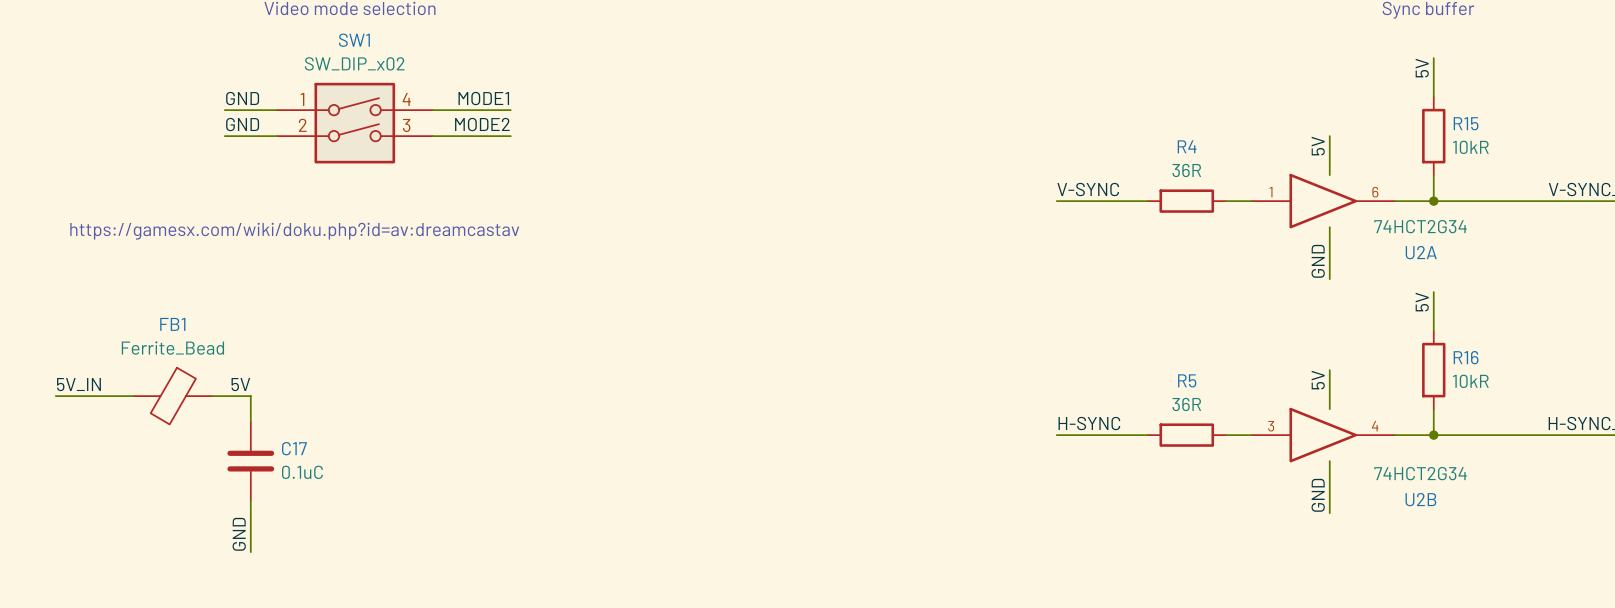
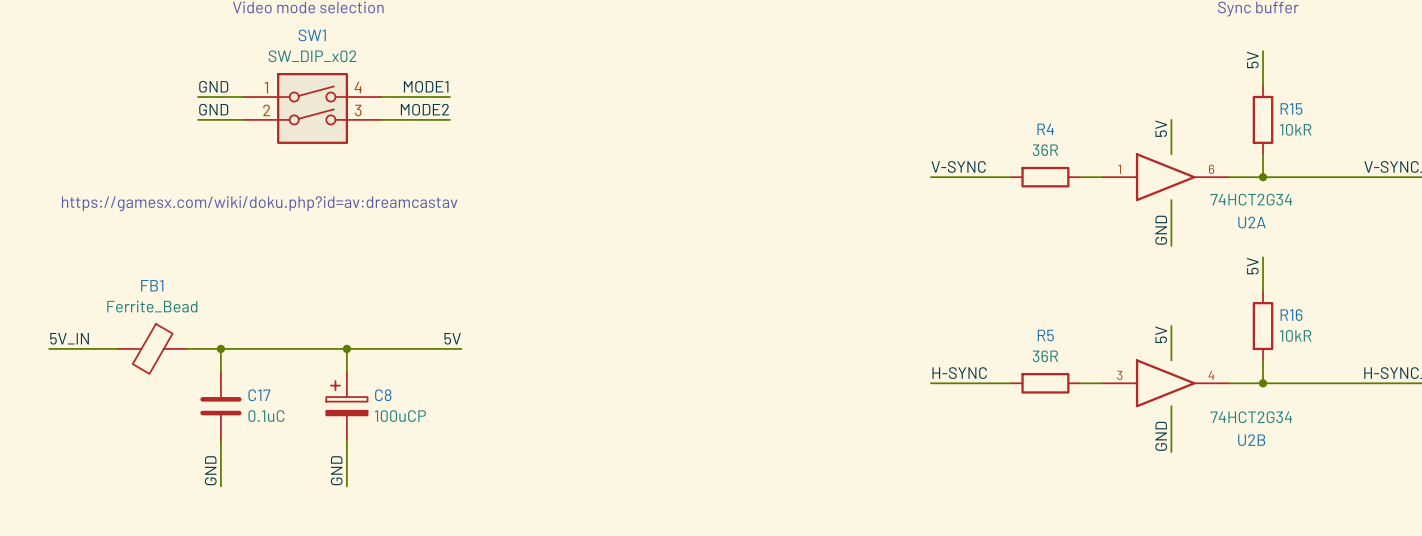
label: 5V (240, 384) -> none
label: none -> 5V (452, 338)
wire: none -> (220, 348) (461, 348)
junction: none -> (220, 348)
wire: none -> (346, 348) (346, 371)
junction: none -> (346, 348)
C8: none -> 100uCP (346, 406)
wire: none -> (346, 440) (346, 486)
label: none -> GND (336, 470)

